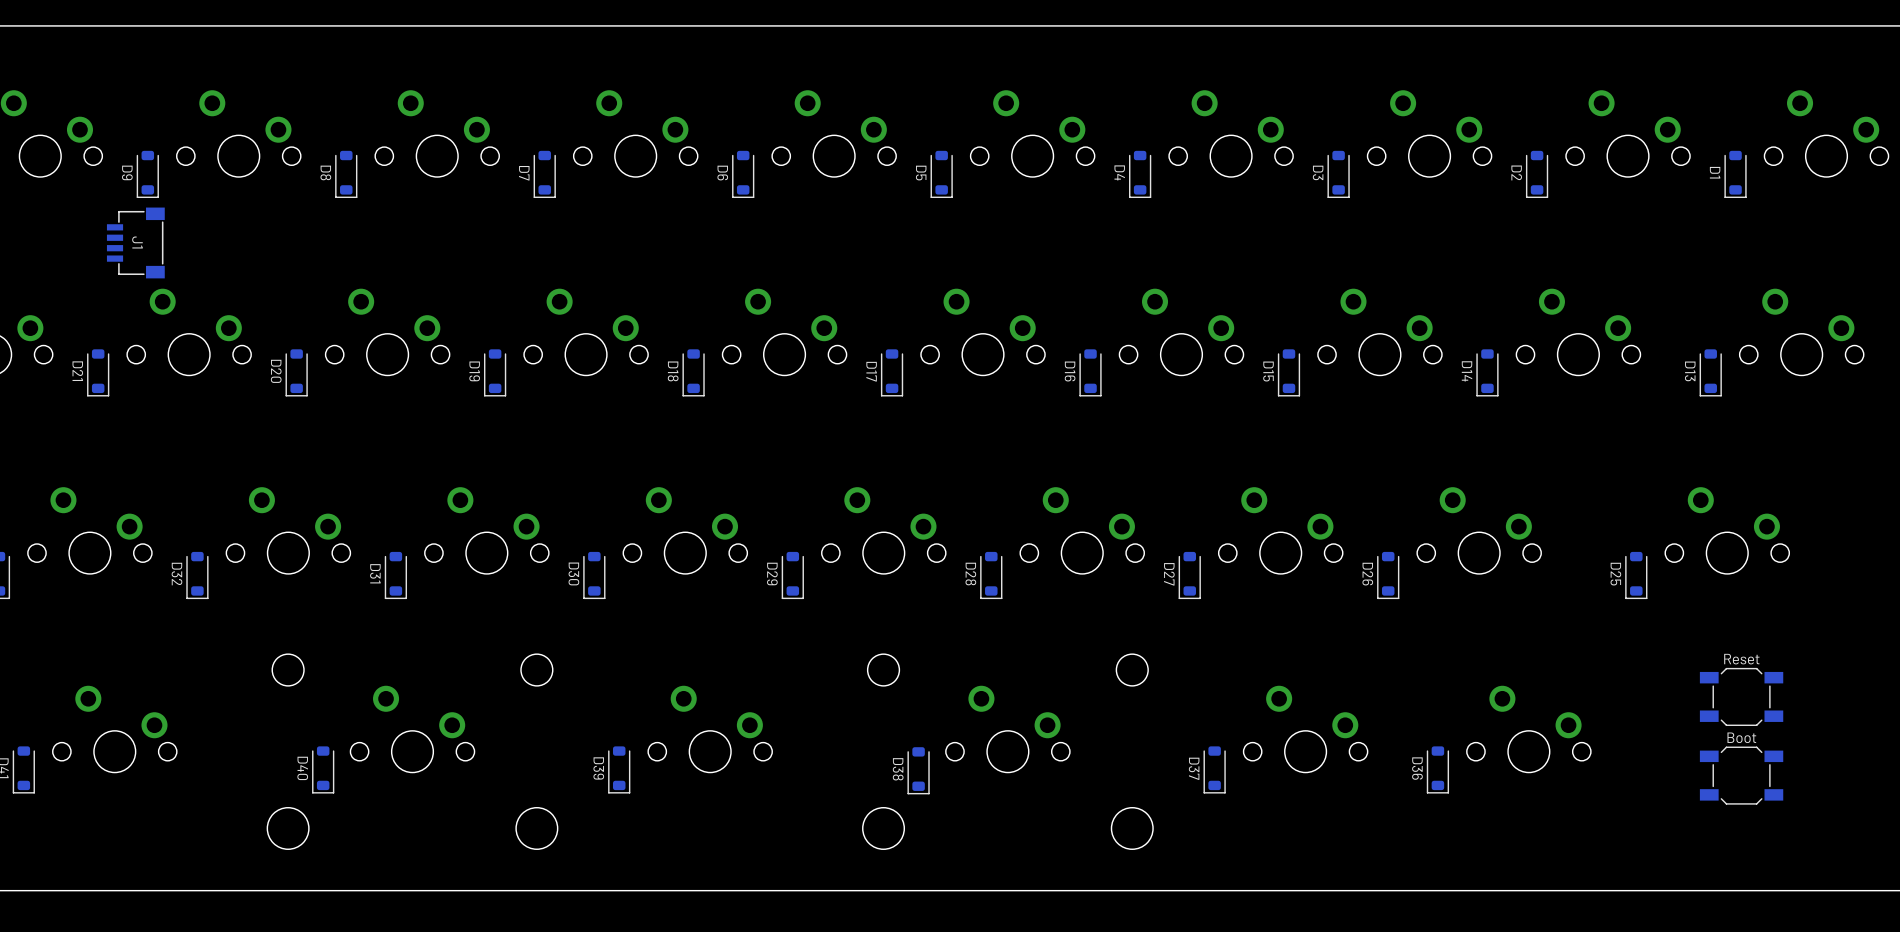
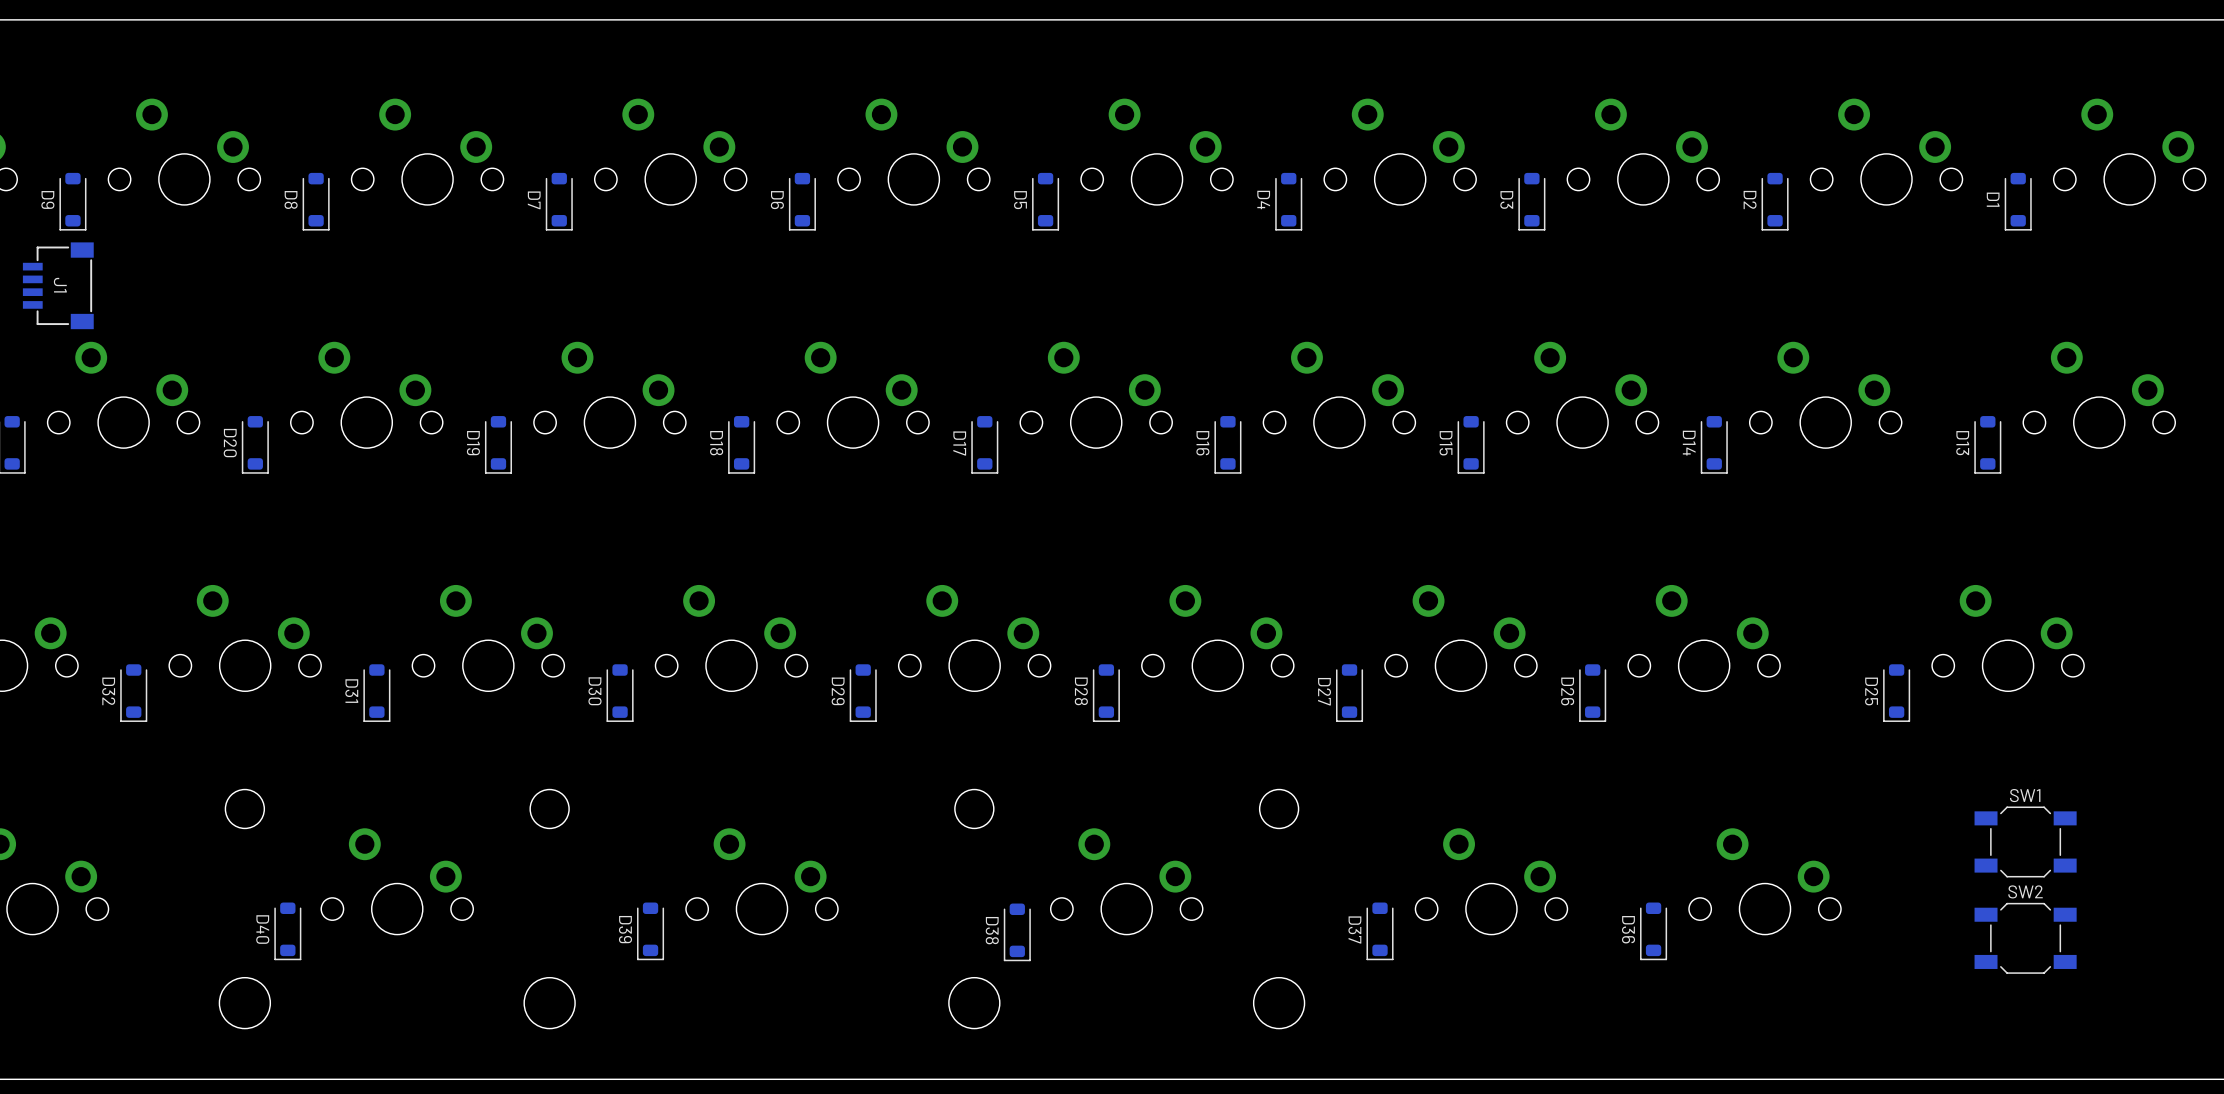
Reset name: Reset (1741, 659) -> SW1 (2025, 795)
Boot name: Boot (1741, 737) -> SW2 (2025, 891)

